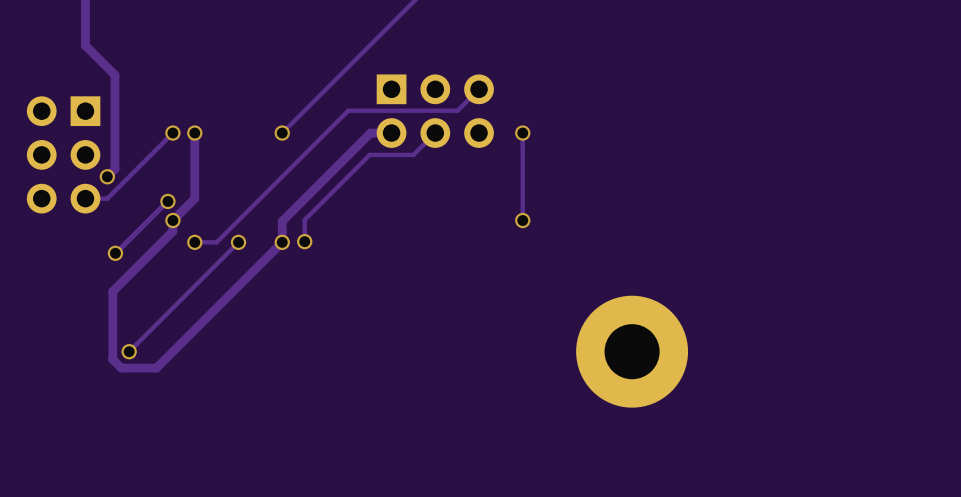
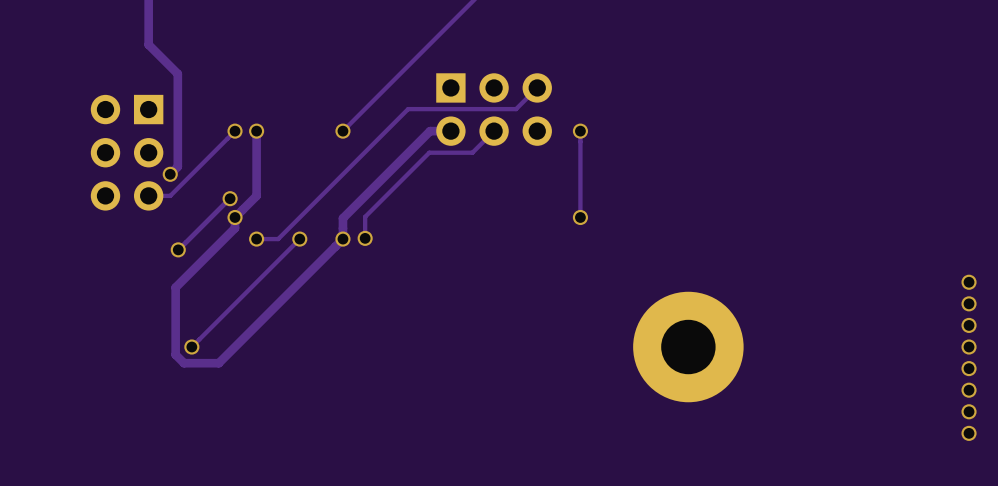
via: none -> (969, 282)
via: none -> (969, 303)
via: none -> (969, 325)
via: none -> (969, 347)
via: none -> (969, 368)
via: none -> (969, 390)
via: none -> (969, 411)
via: none -> (969, 433)

